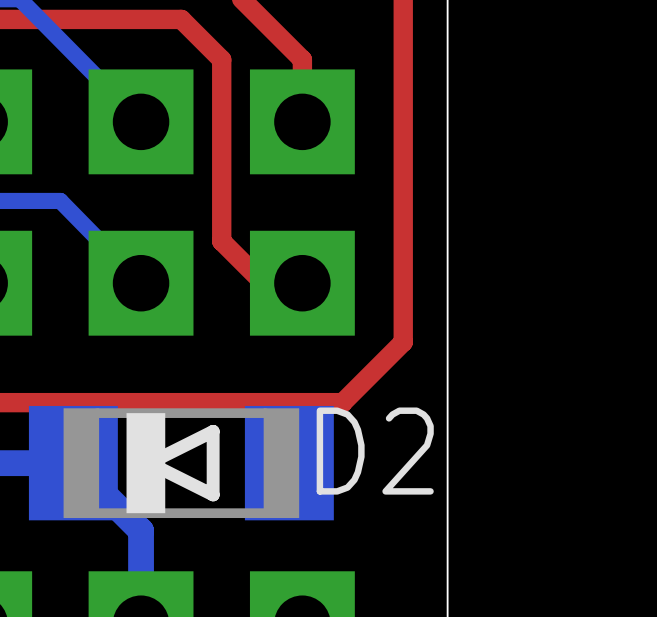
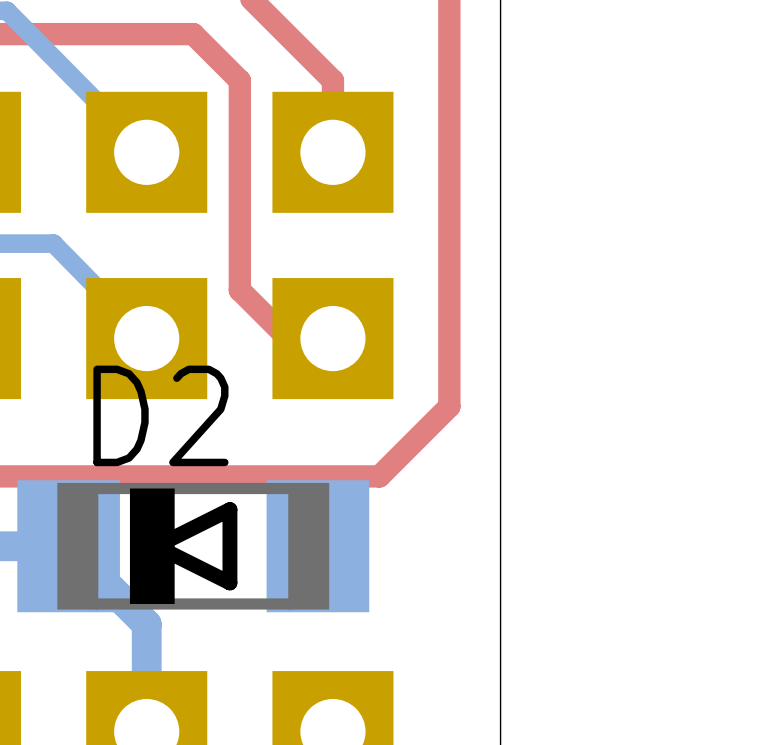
D2 name position: D2 (375, 451) -> D2 (160, 415)

